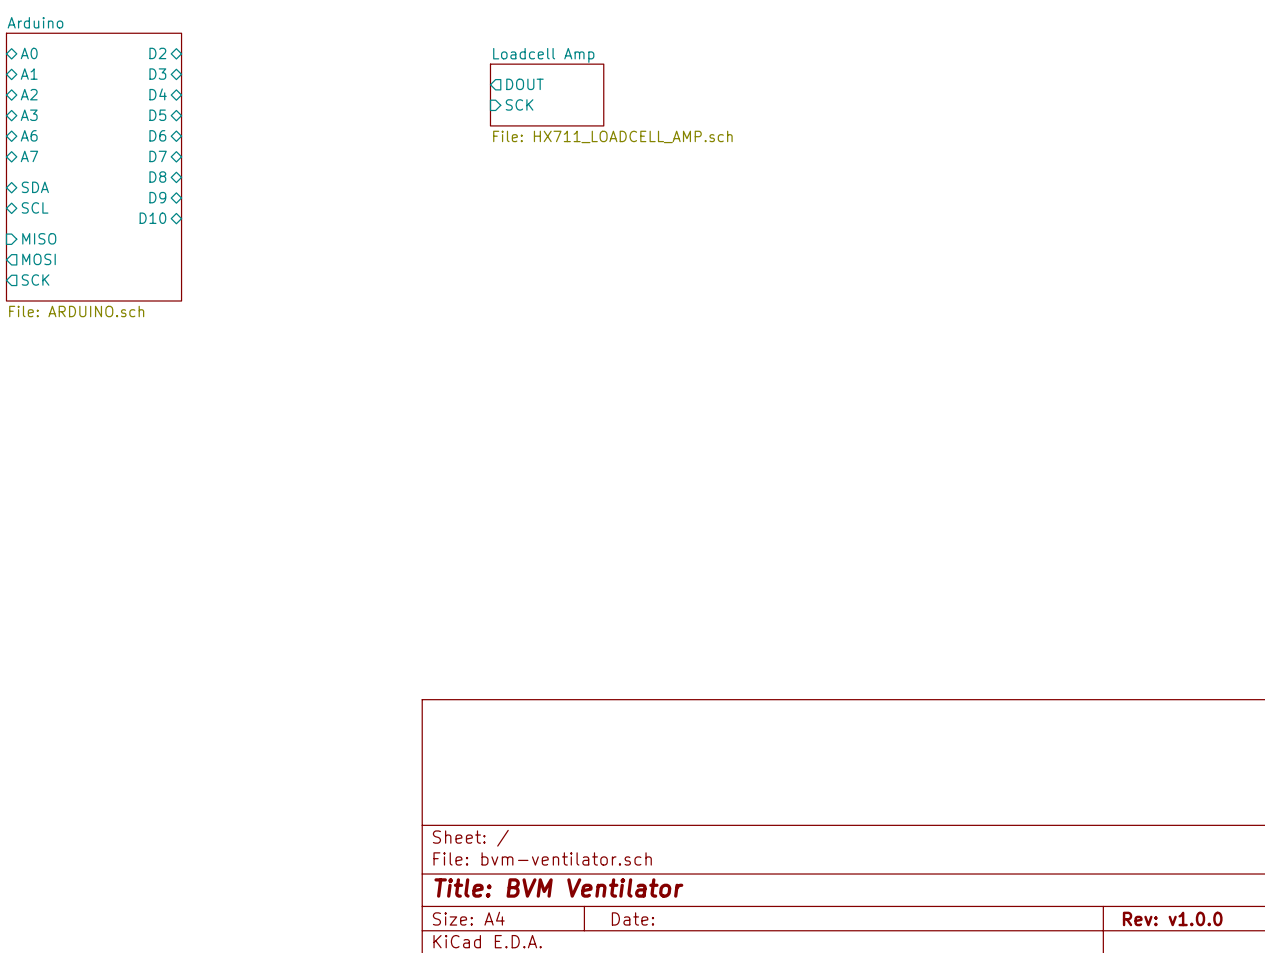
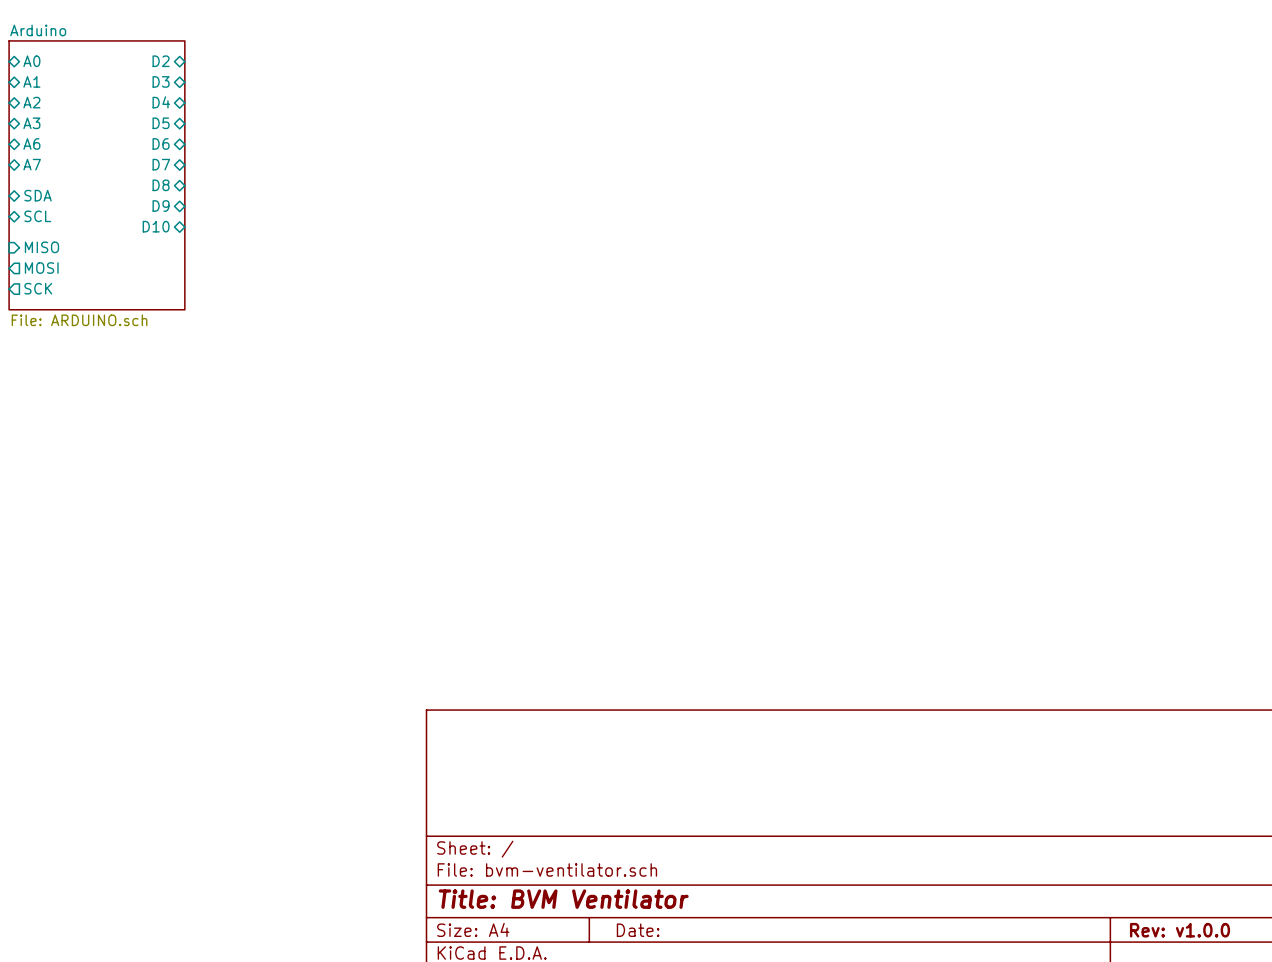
sheet pin: DOUT (524, 84) -> none
sheet Loadcell Amp: File: HX711_LOADCELL_AMP.sch (547, 95) -> none
sheet pin: SCK (519, 104) -> none

